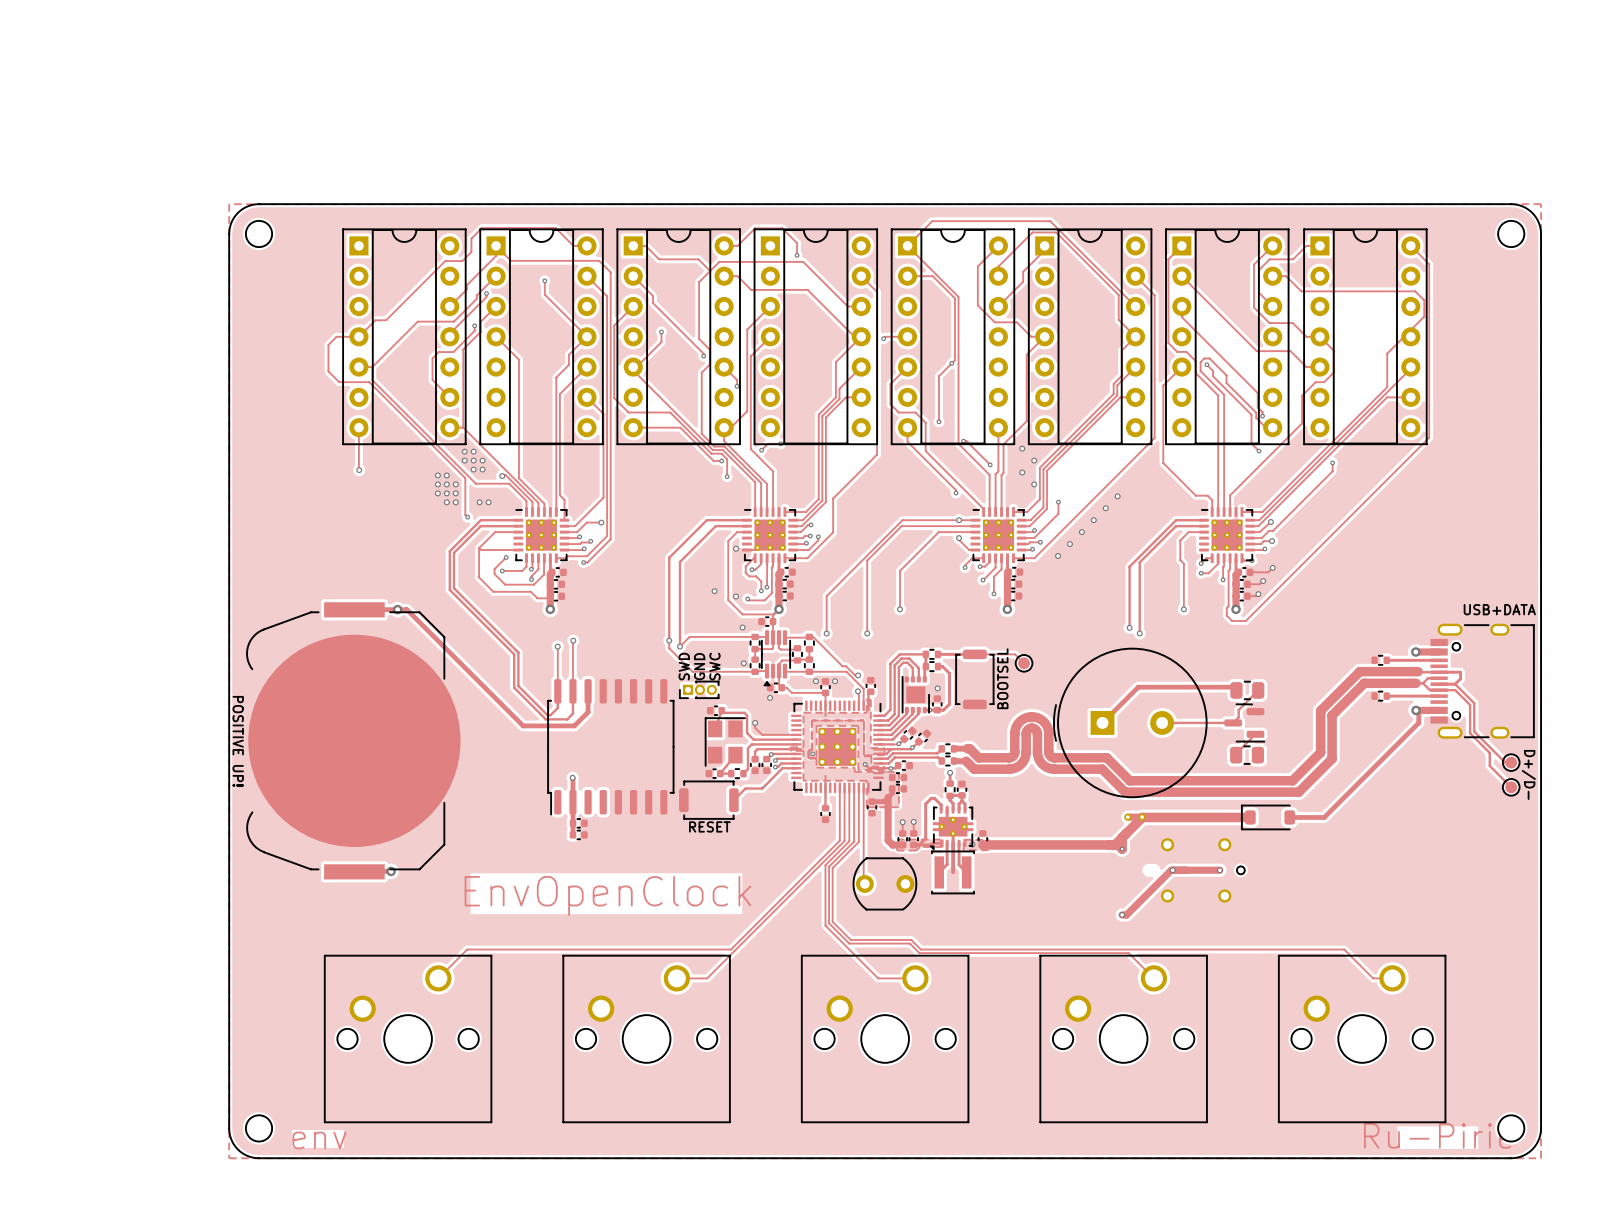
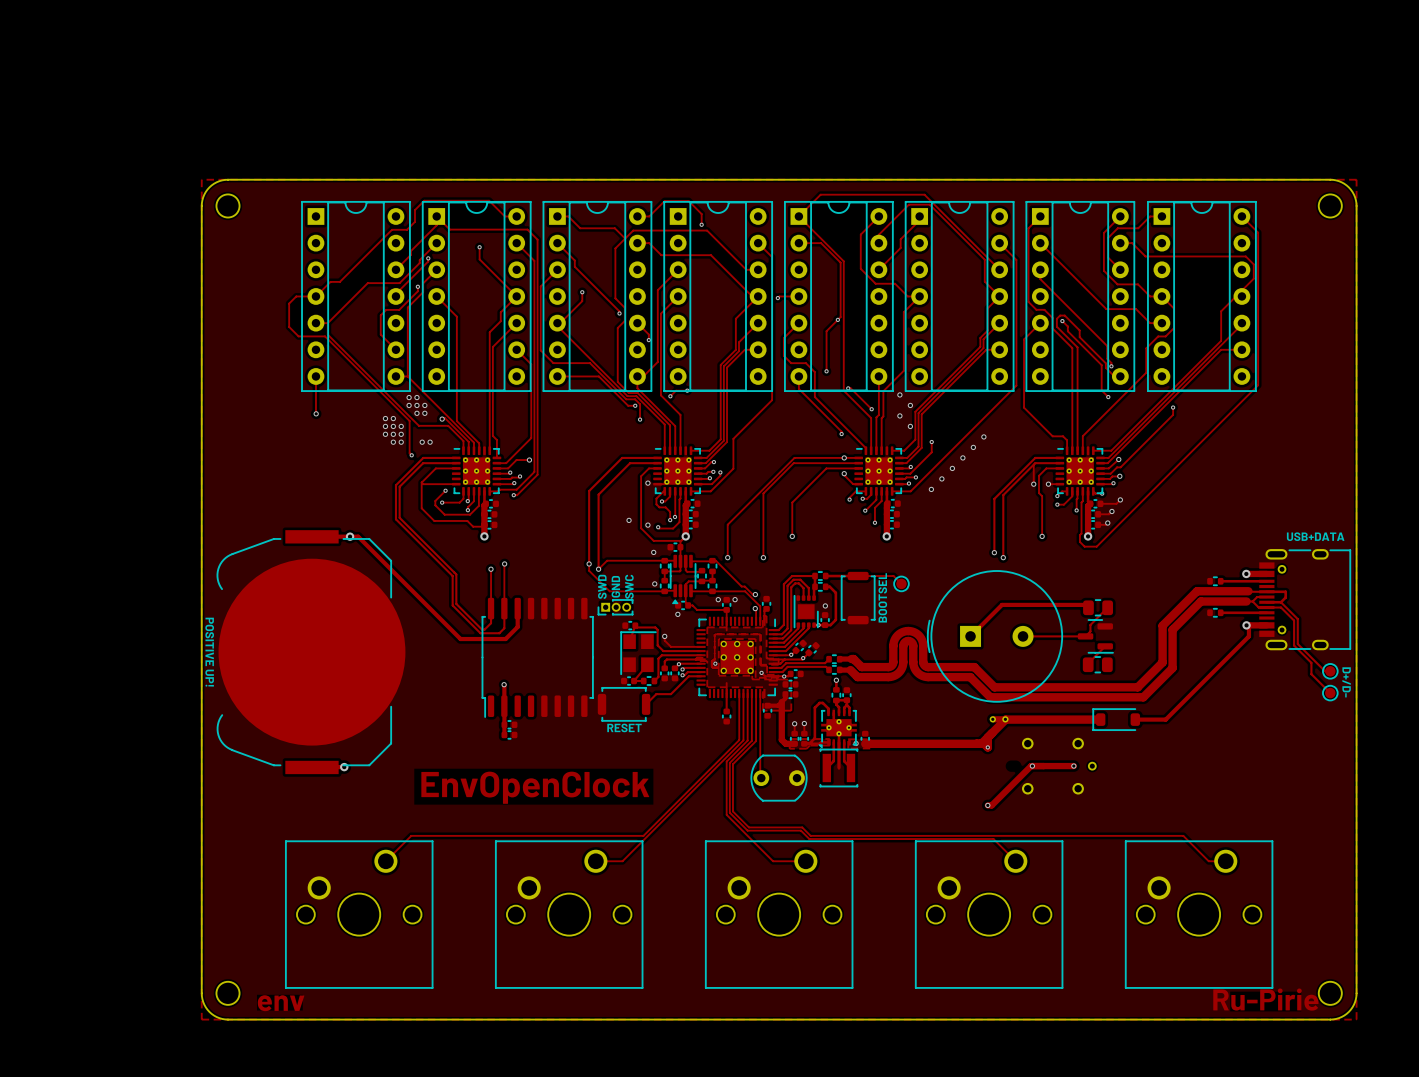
track: none -> (1034, 463) (1033, 484)
via: none -> (1033, 484)
track: none -> (1048, 484) (1059, 484)
via: none -> (1048, 484)

